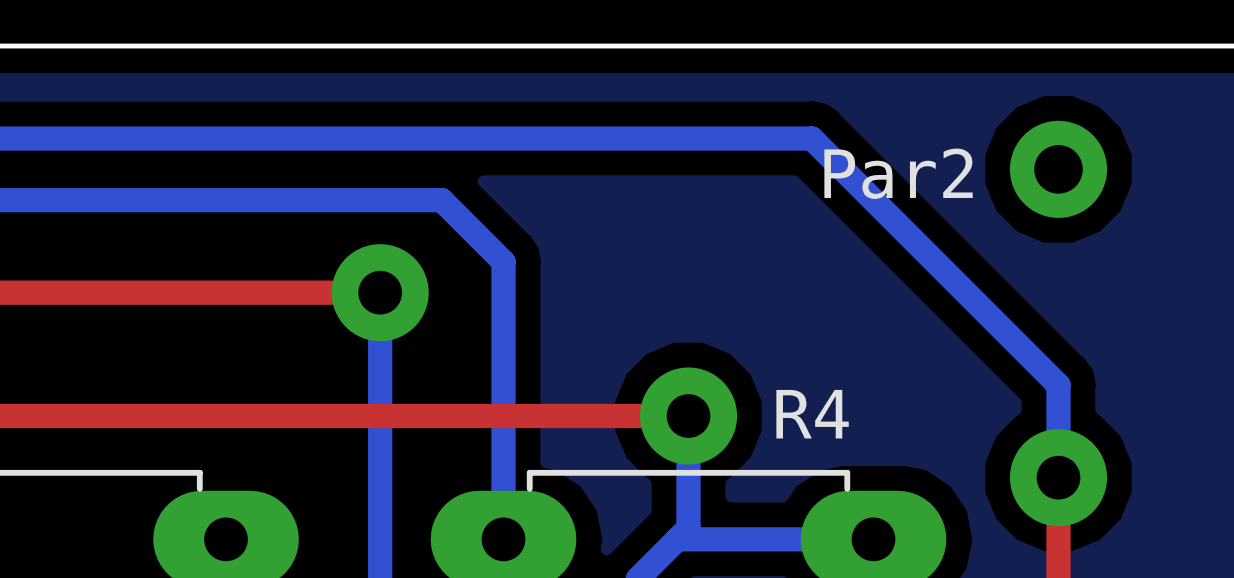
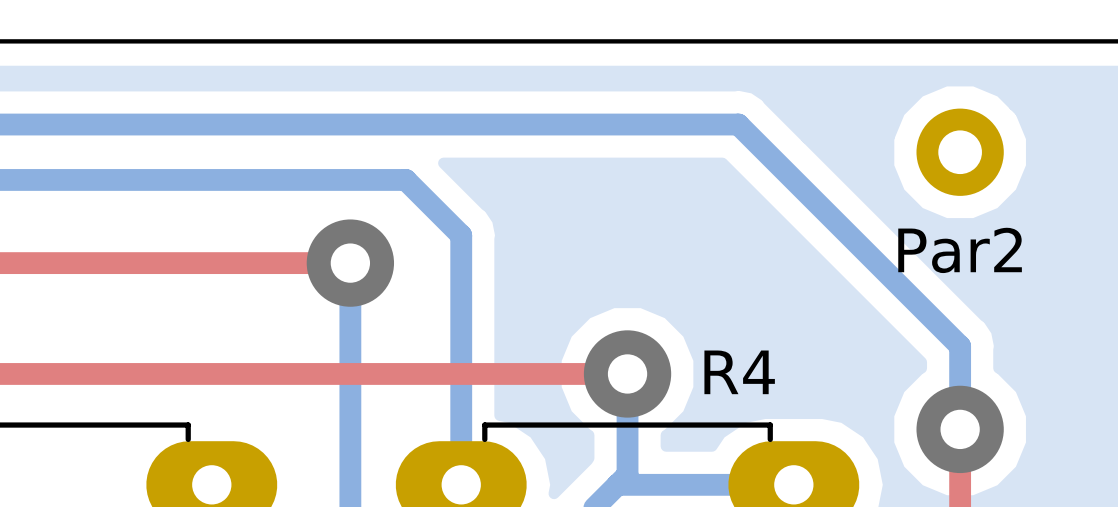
Par2 name position: Par2 (898, 173) -> Par2 (960, 250)

